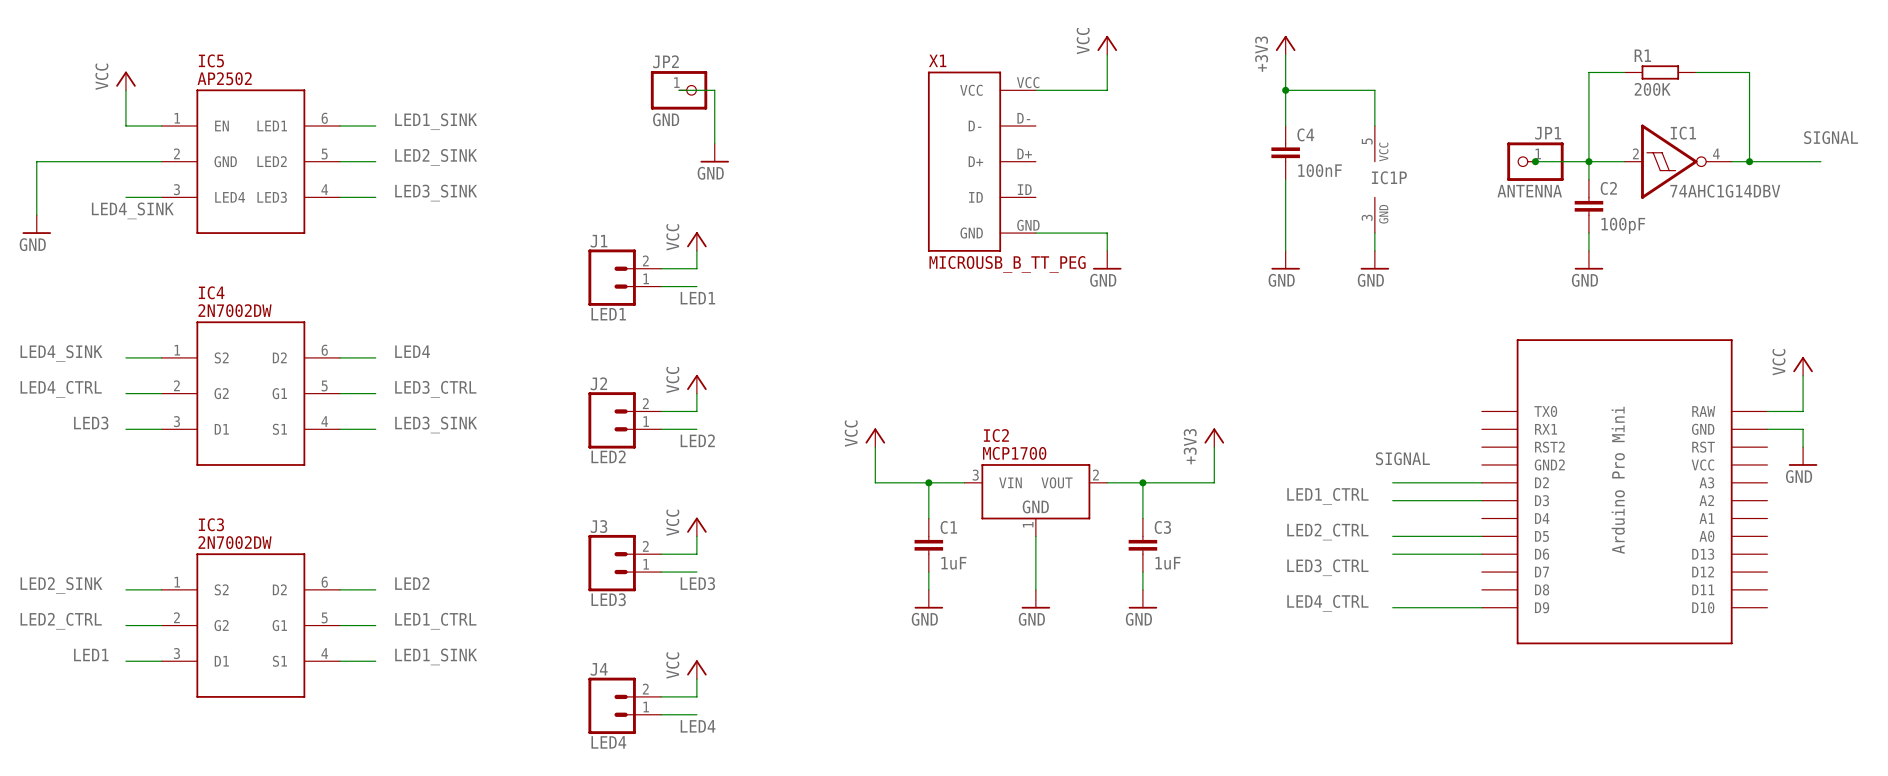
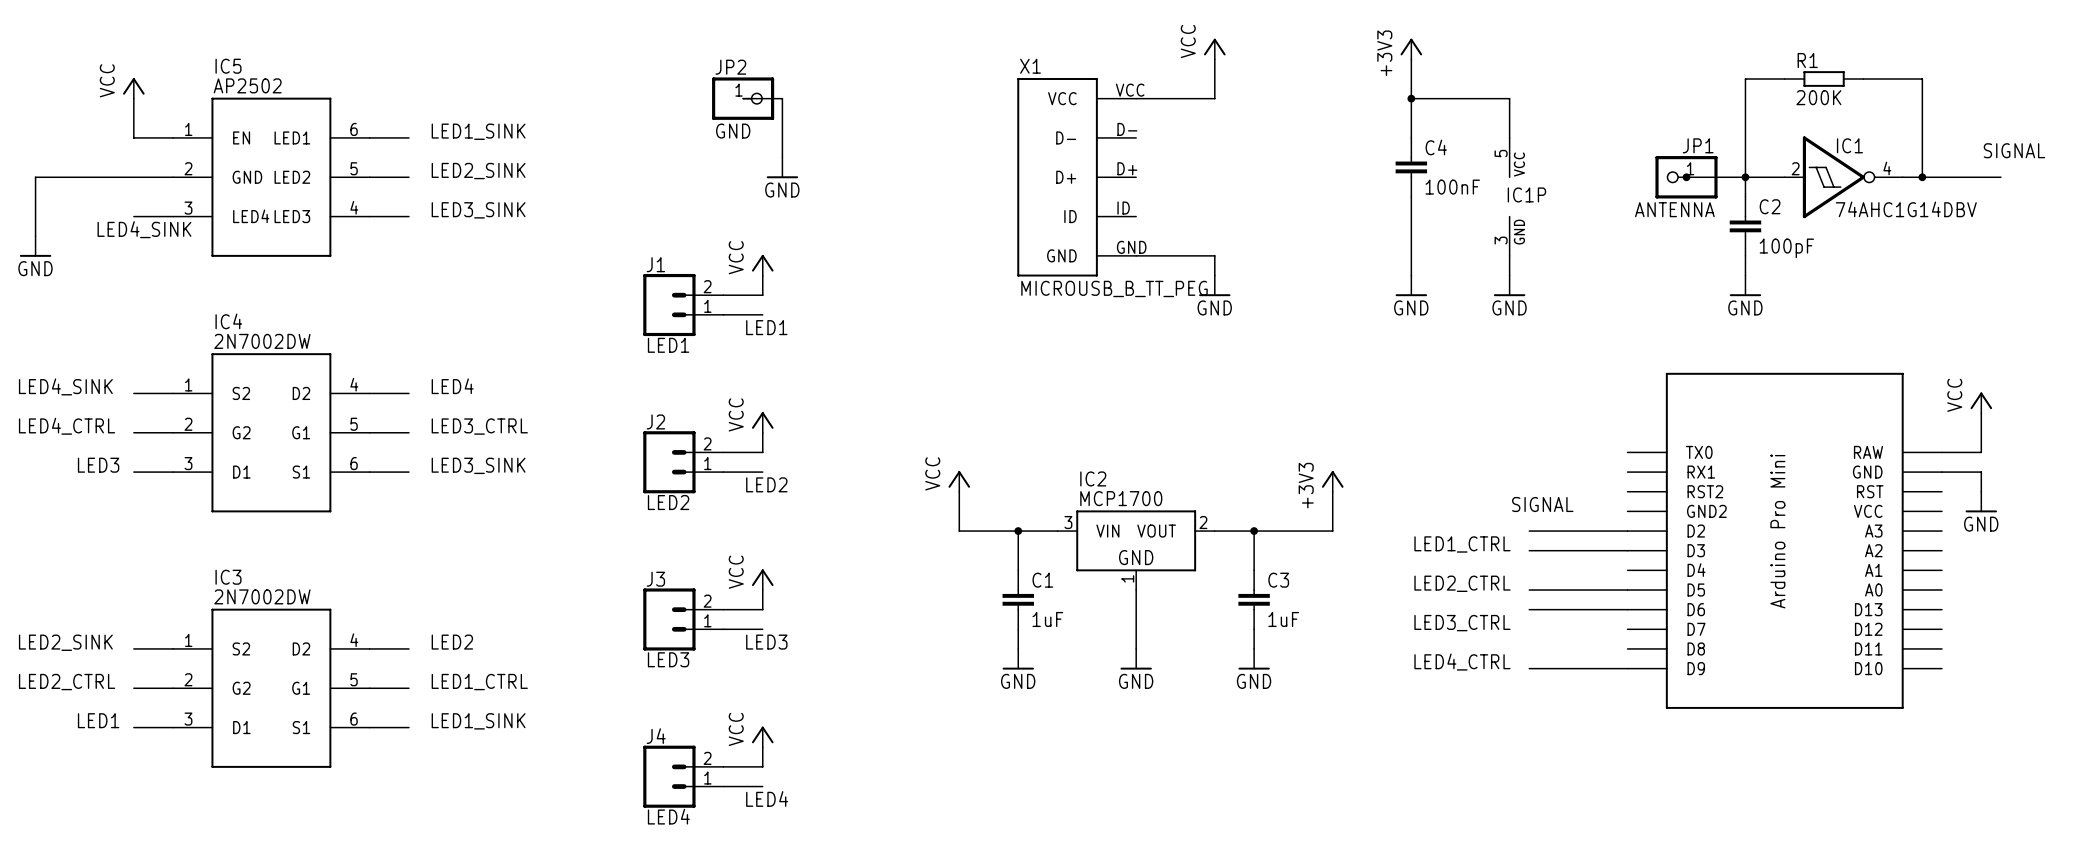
IC4 pin number: 6 (324, 350) -> 4 (354, 384)
IC4 pin number: 4 (324, 421) -> 6 (354, 463)
IC3 pin number: 6 (324, 582) -> 4 (354, 640)
IC3 pin number: 4 (324, 653) -> 6 (354, 719)

